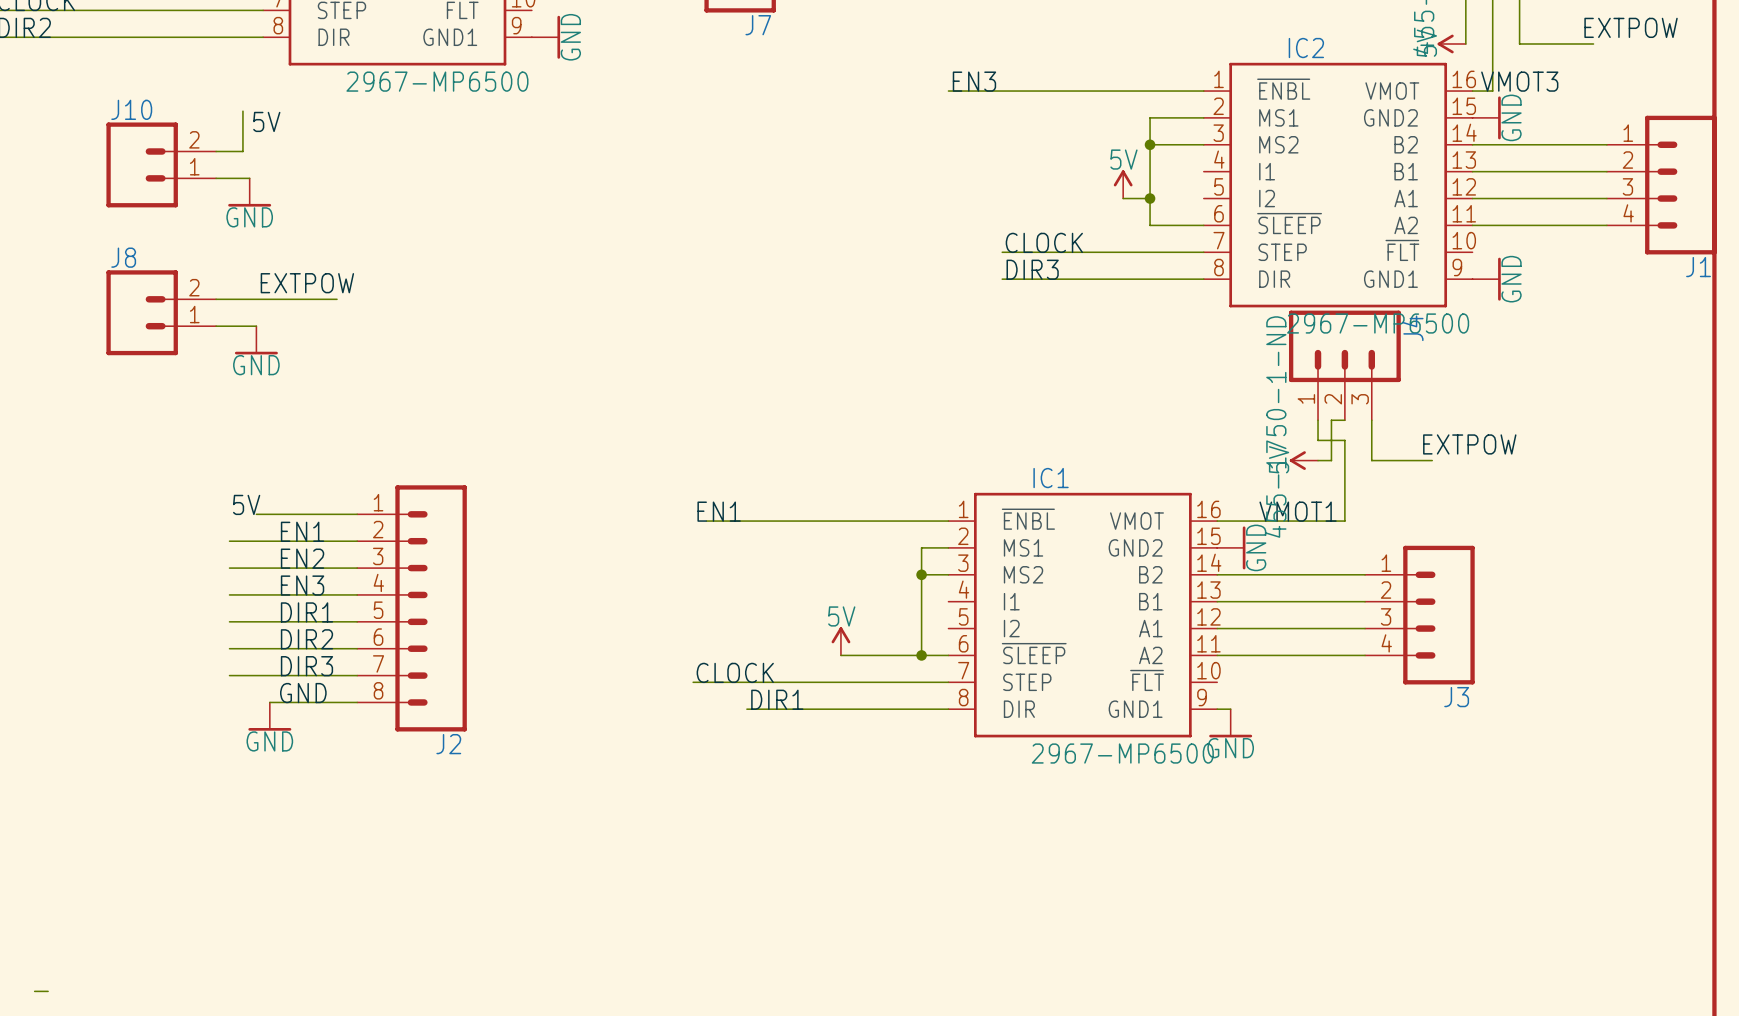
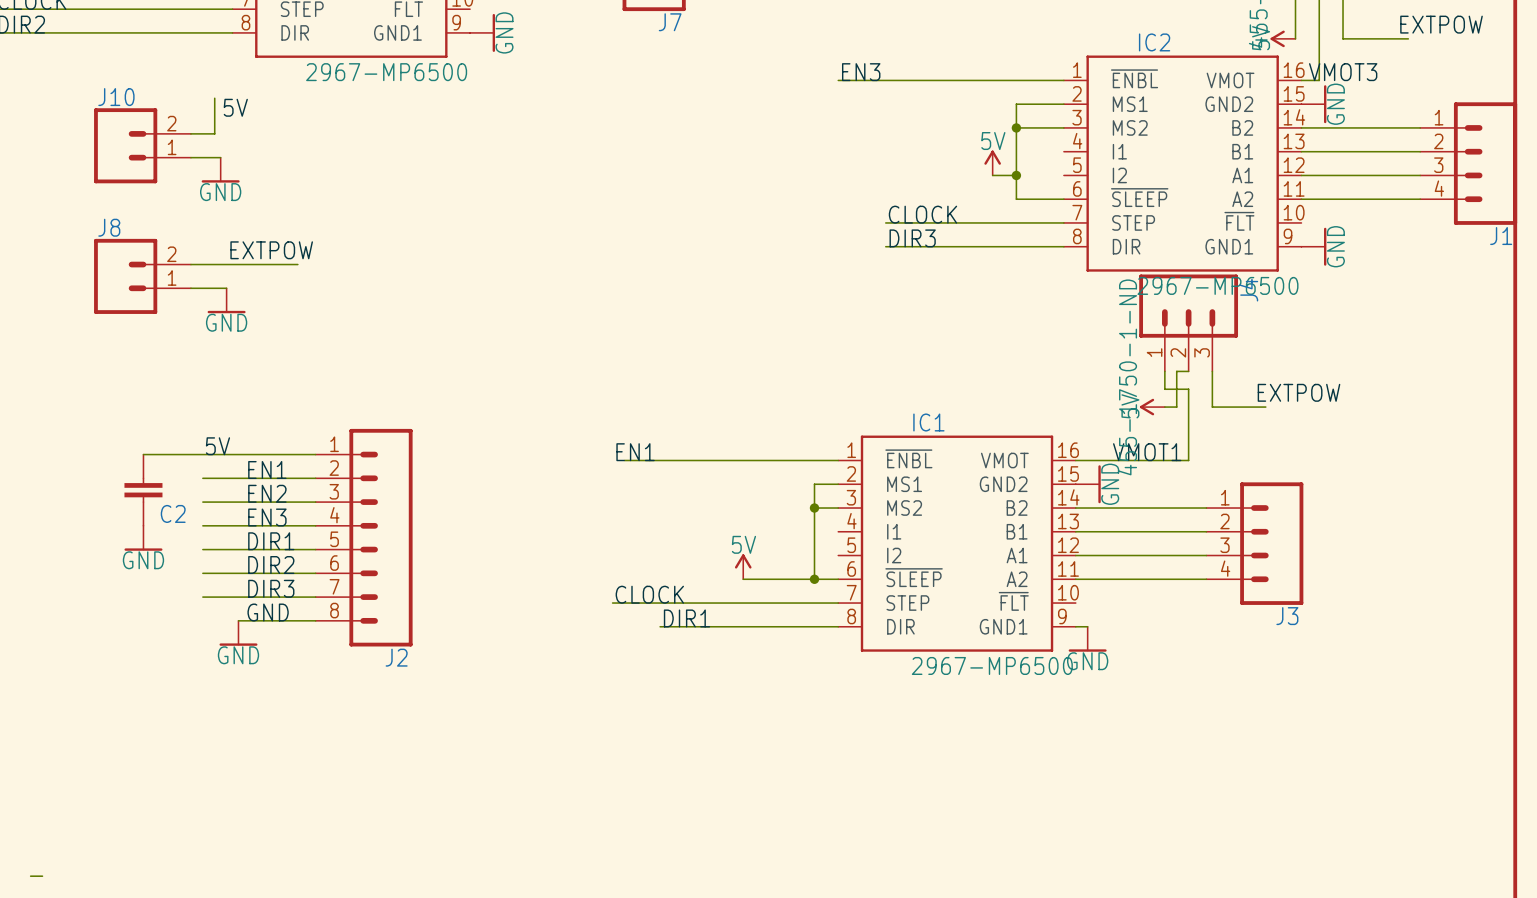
wire: none -> (143, 454) (226, 454)
C2: none -> (143, 490)
power symbol: none -> GND (143, 538)

